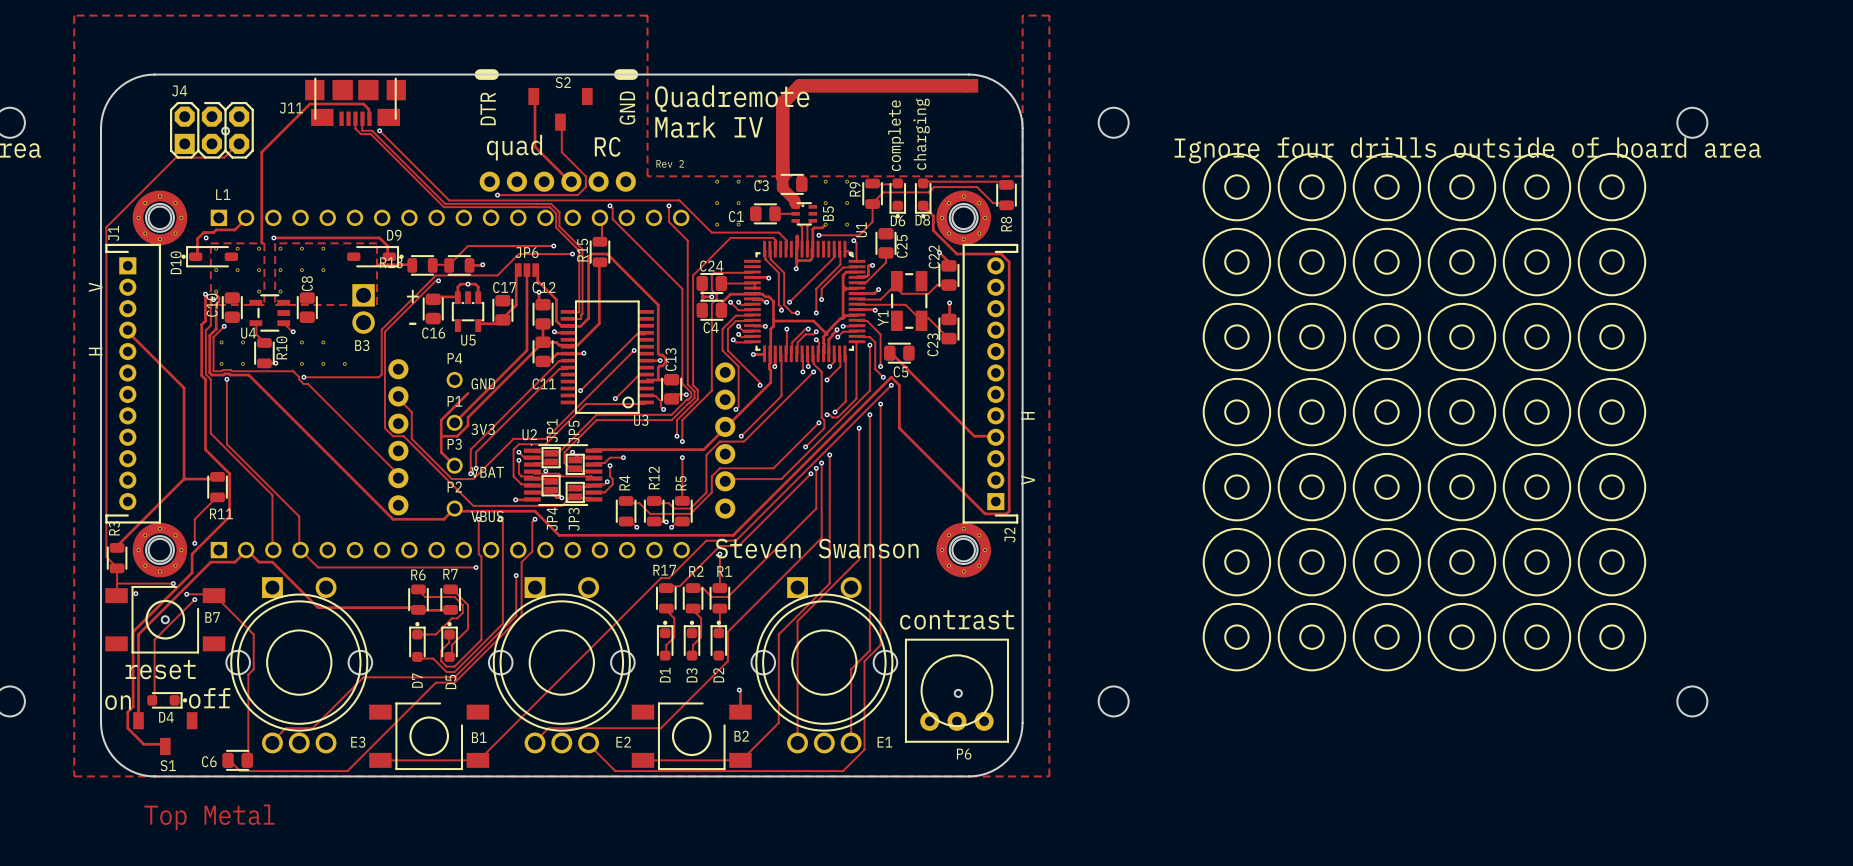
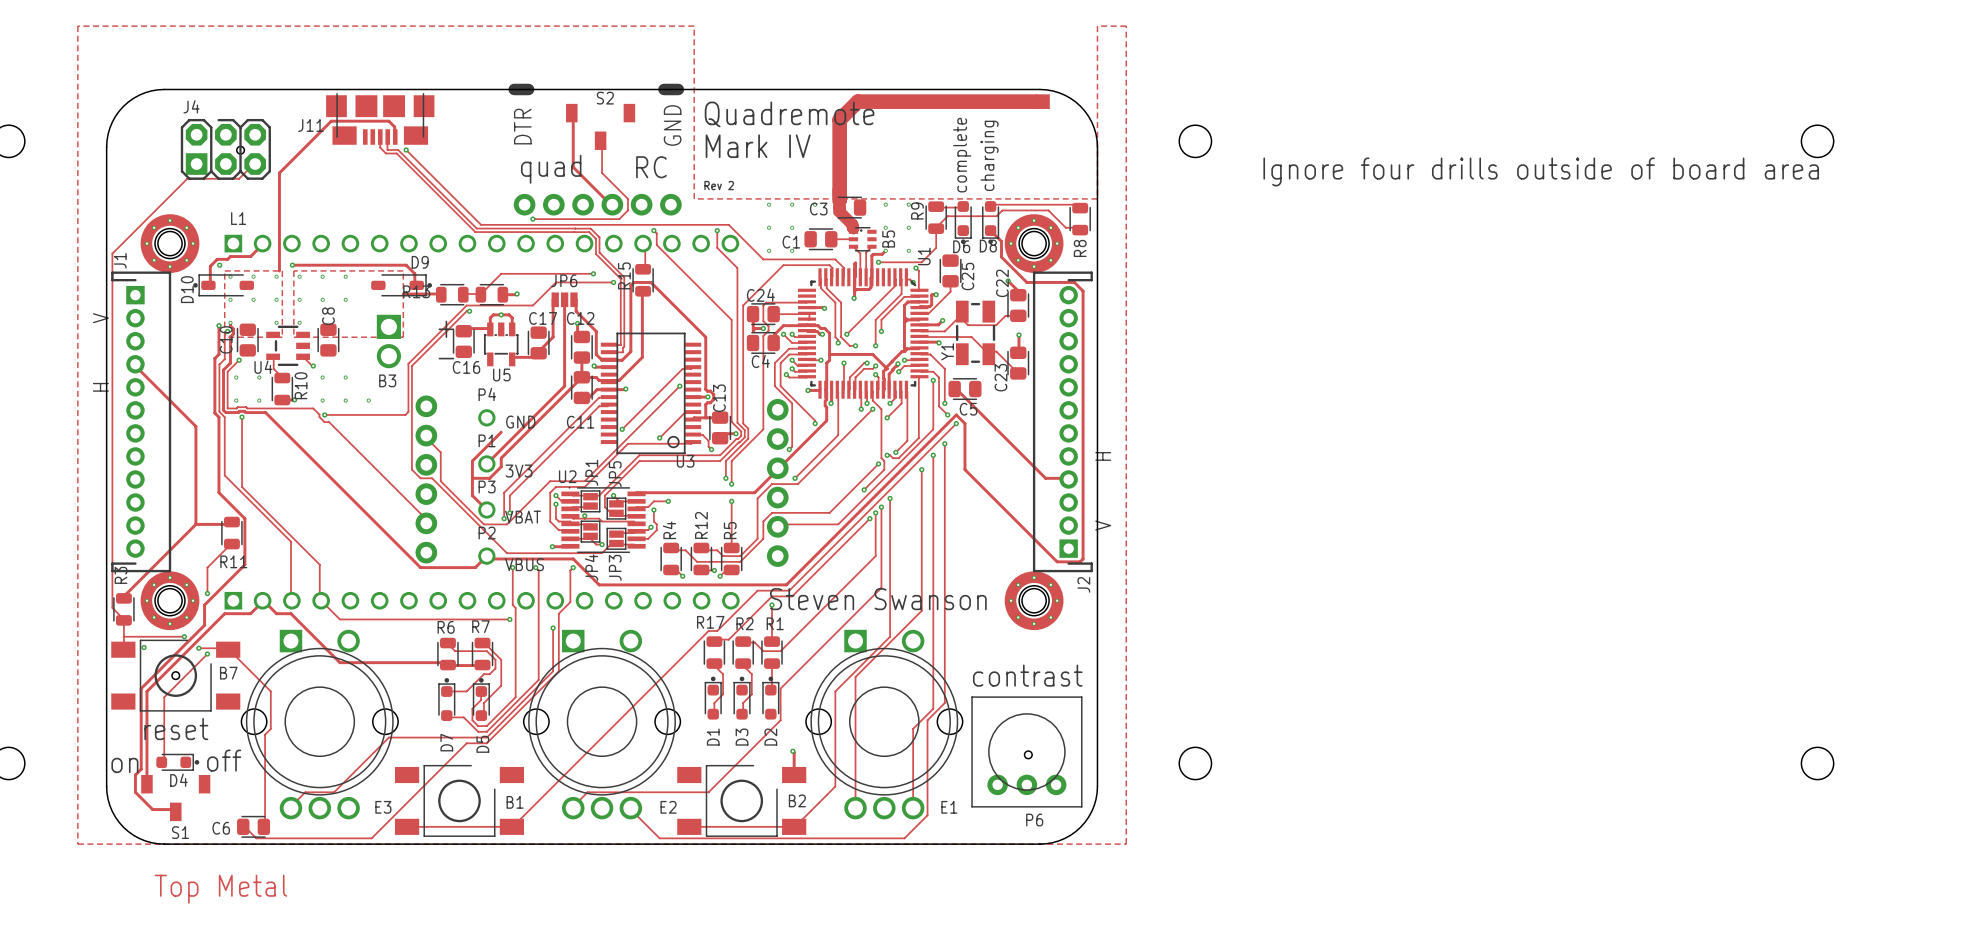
drawing: [1203, 153, 1646, 672] -> none

